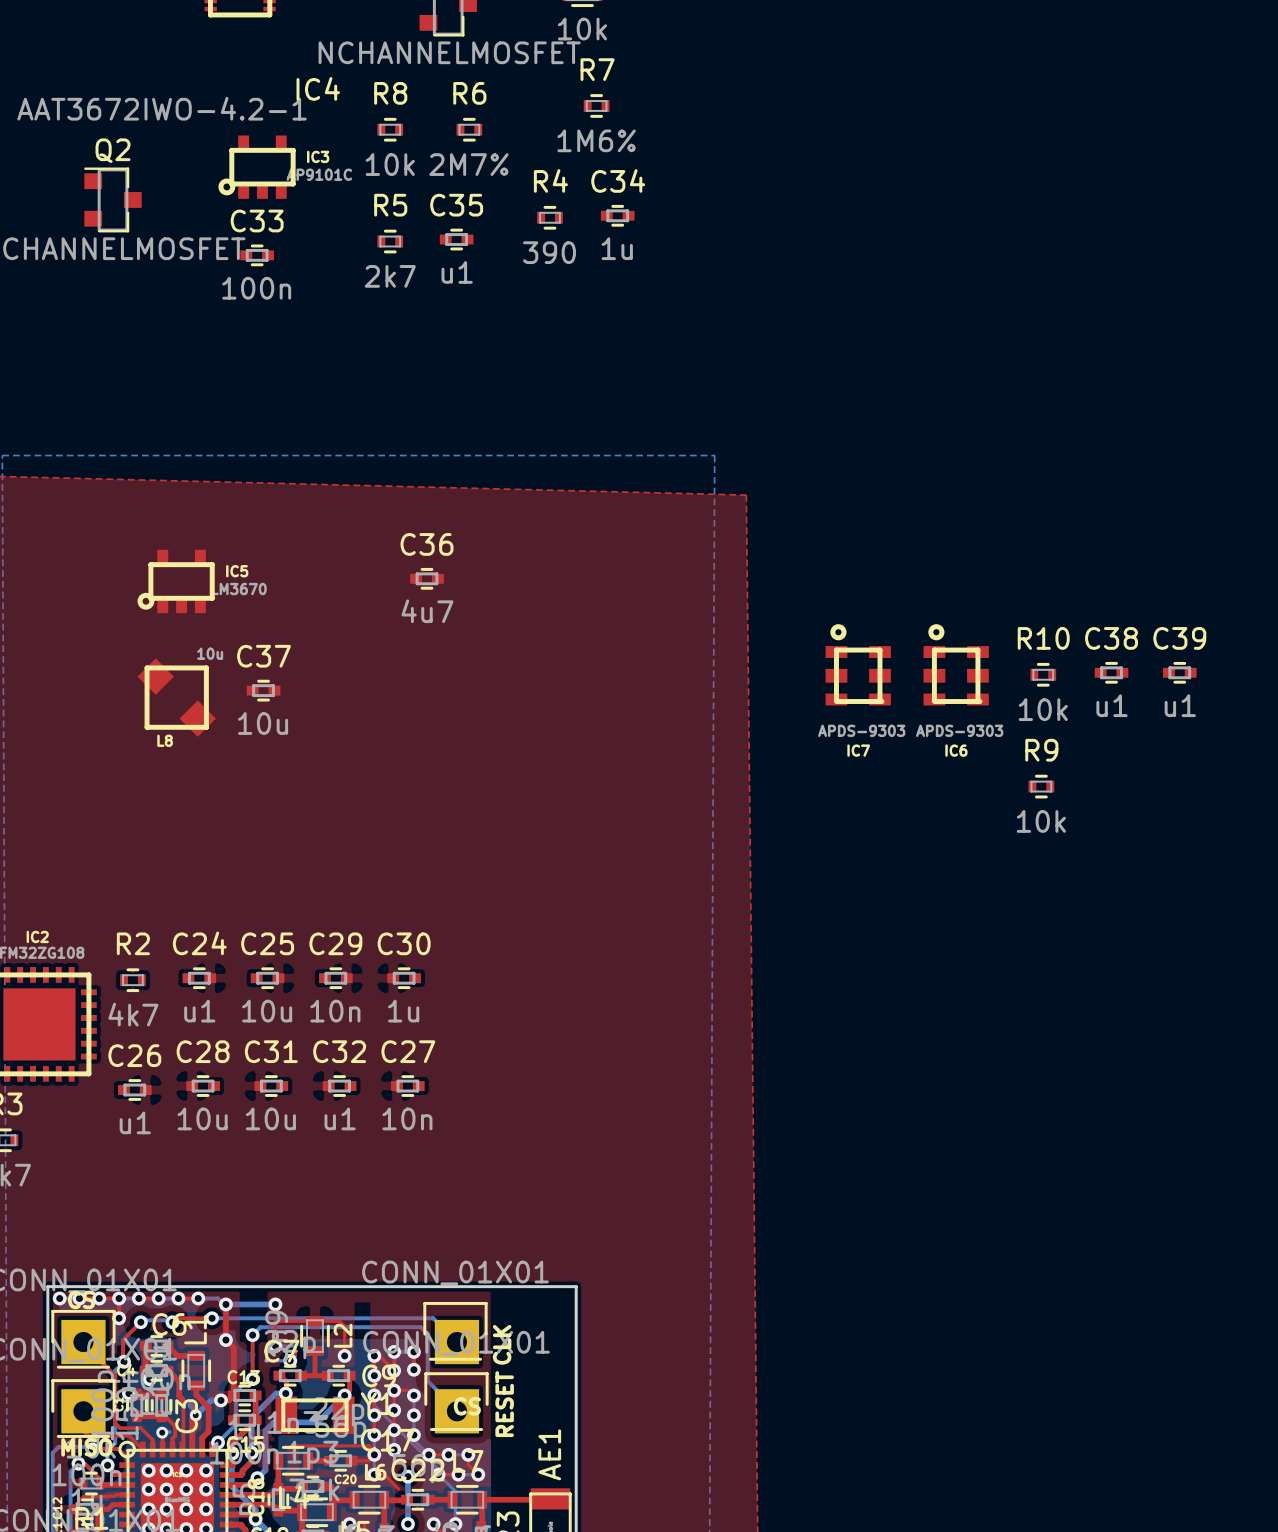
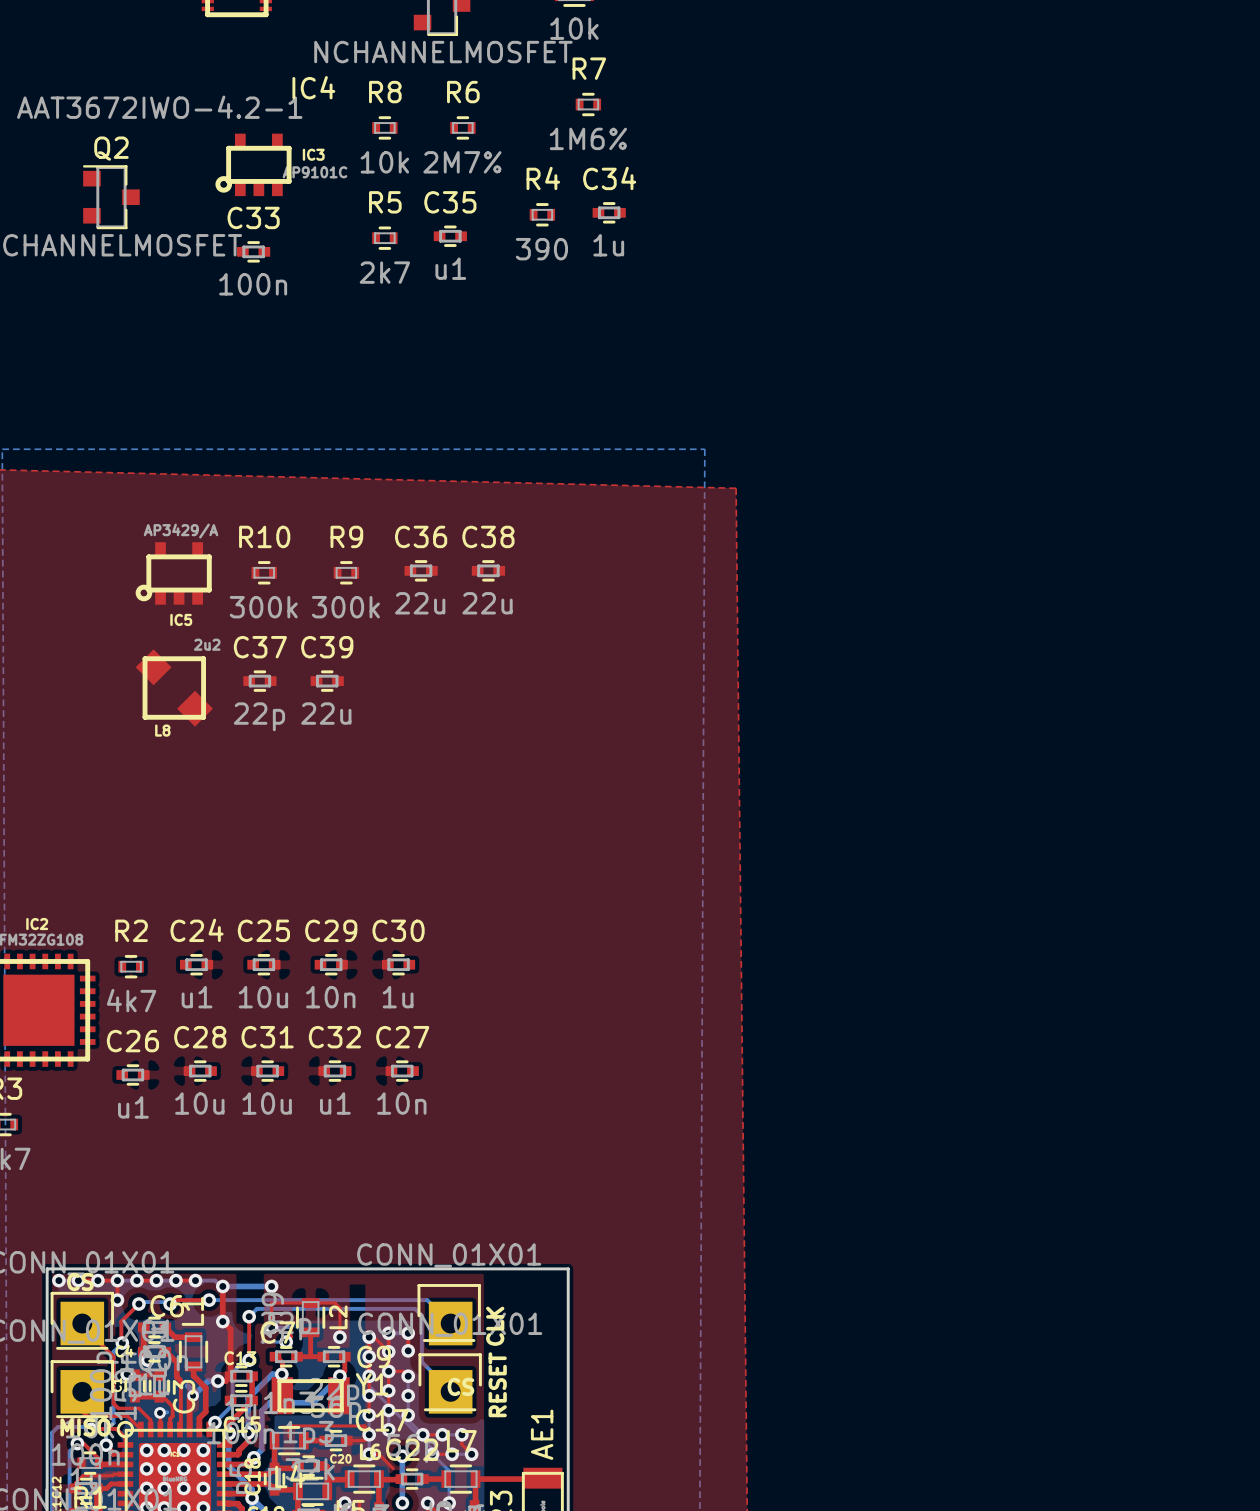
IC5 name position: IC5 (237, 571) -> IC5 (181, 619)
IC5 value: LM3670 (239, 589) -> AP3429/A (181, 531)
C36 value: 4u7 (427, 611) -> 22u (420, 603)
L8 value: 10u (210, 653) -> 2u2 (207, 644)
IC7: APDS-9303 (858, 664) -> none
IC6: APDS-9303 (956, 664) -> none
C38 position: (1111, 672) -> (488, 570)
C39 position: (1179, 672) -> (327, 681)
R10 position: (1043, 674) -> (264, 572)
C38 value: u1 (1112, 705) -> 22u (487, 603)
C39 value: u1 (1180, 705) -> 22u (326, 713)
R10 value: 10k (1043, 709) -> 300k (263, 607)
C37 value: 10u (263, 723) -> 22p (259, 716)
R9 position: (1041, 786) -> (346, 572)
R9 value: 10k (1041, 821) -> 300k (345, 607)

